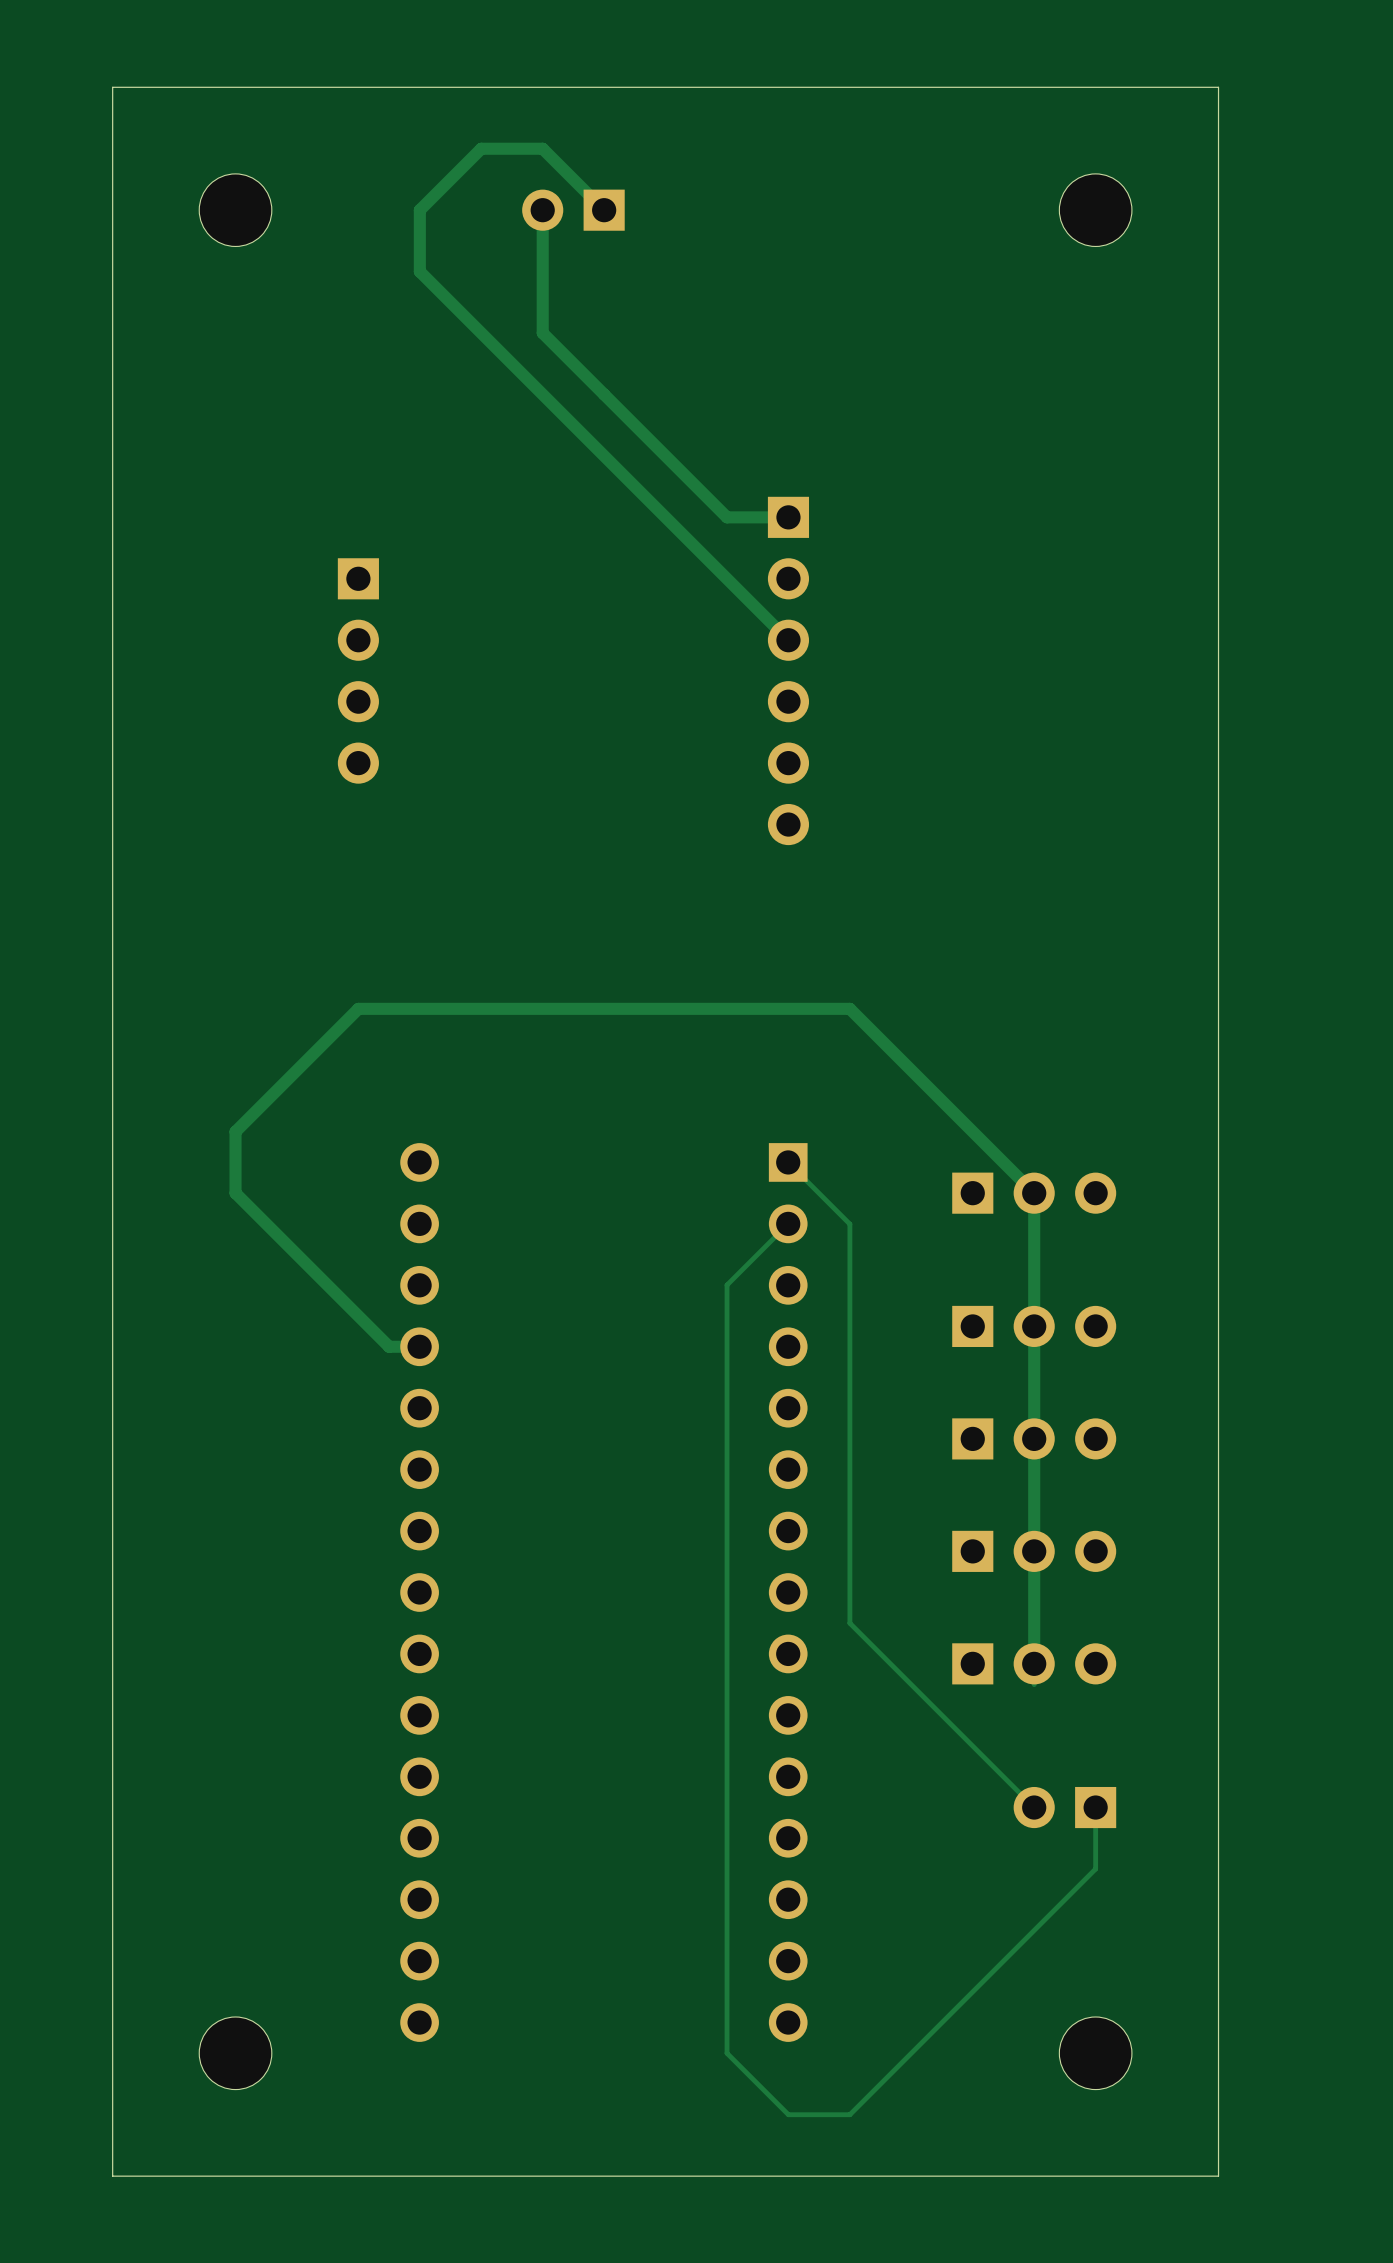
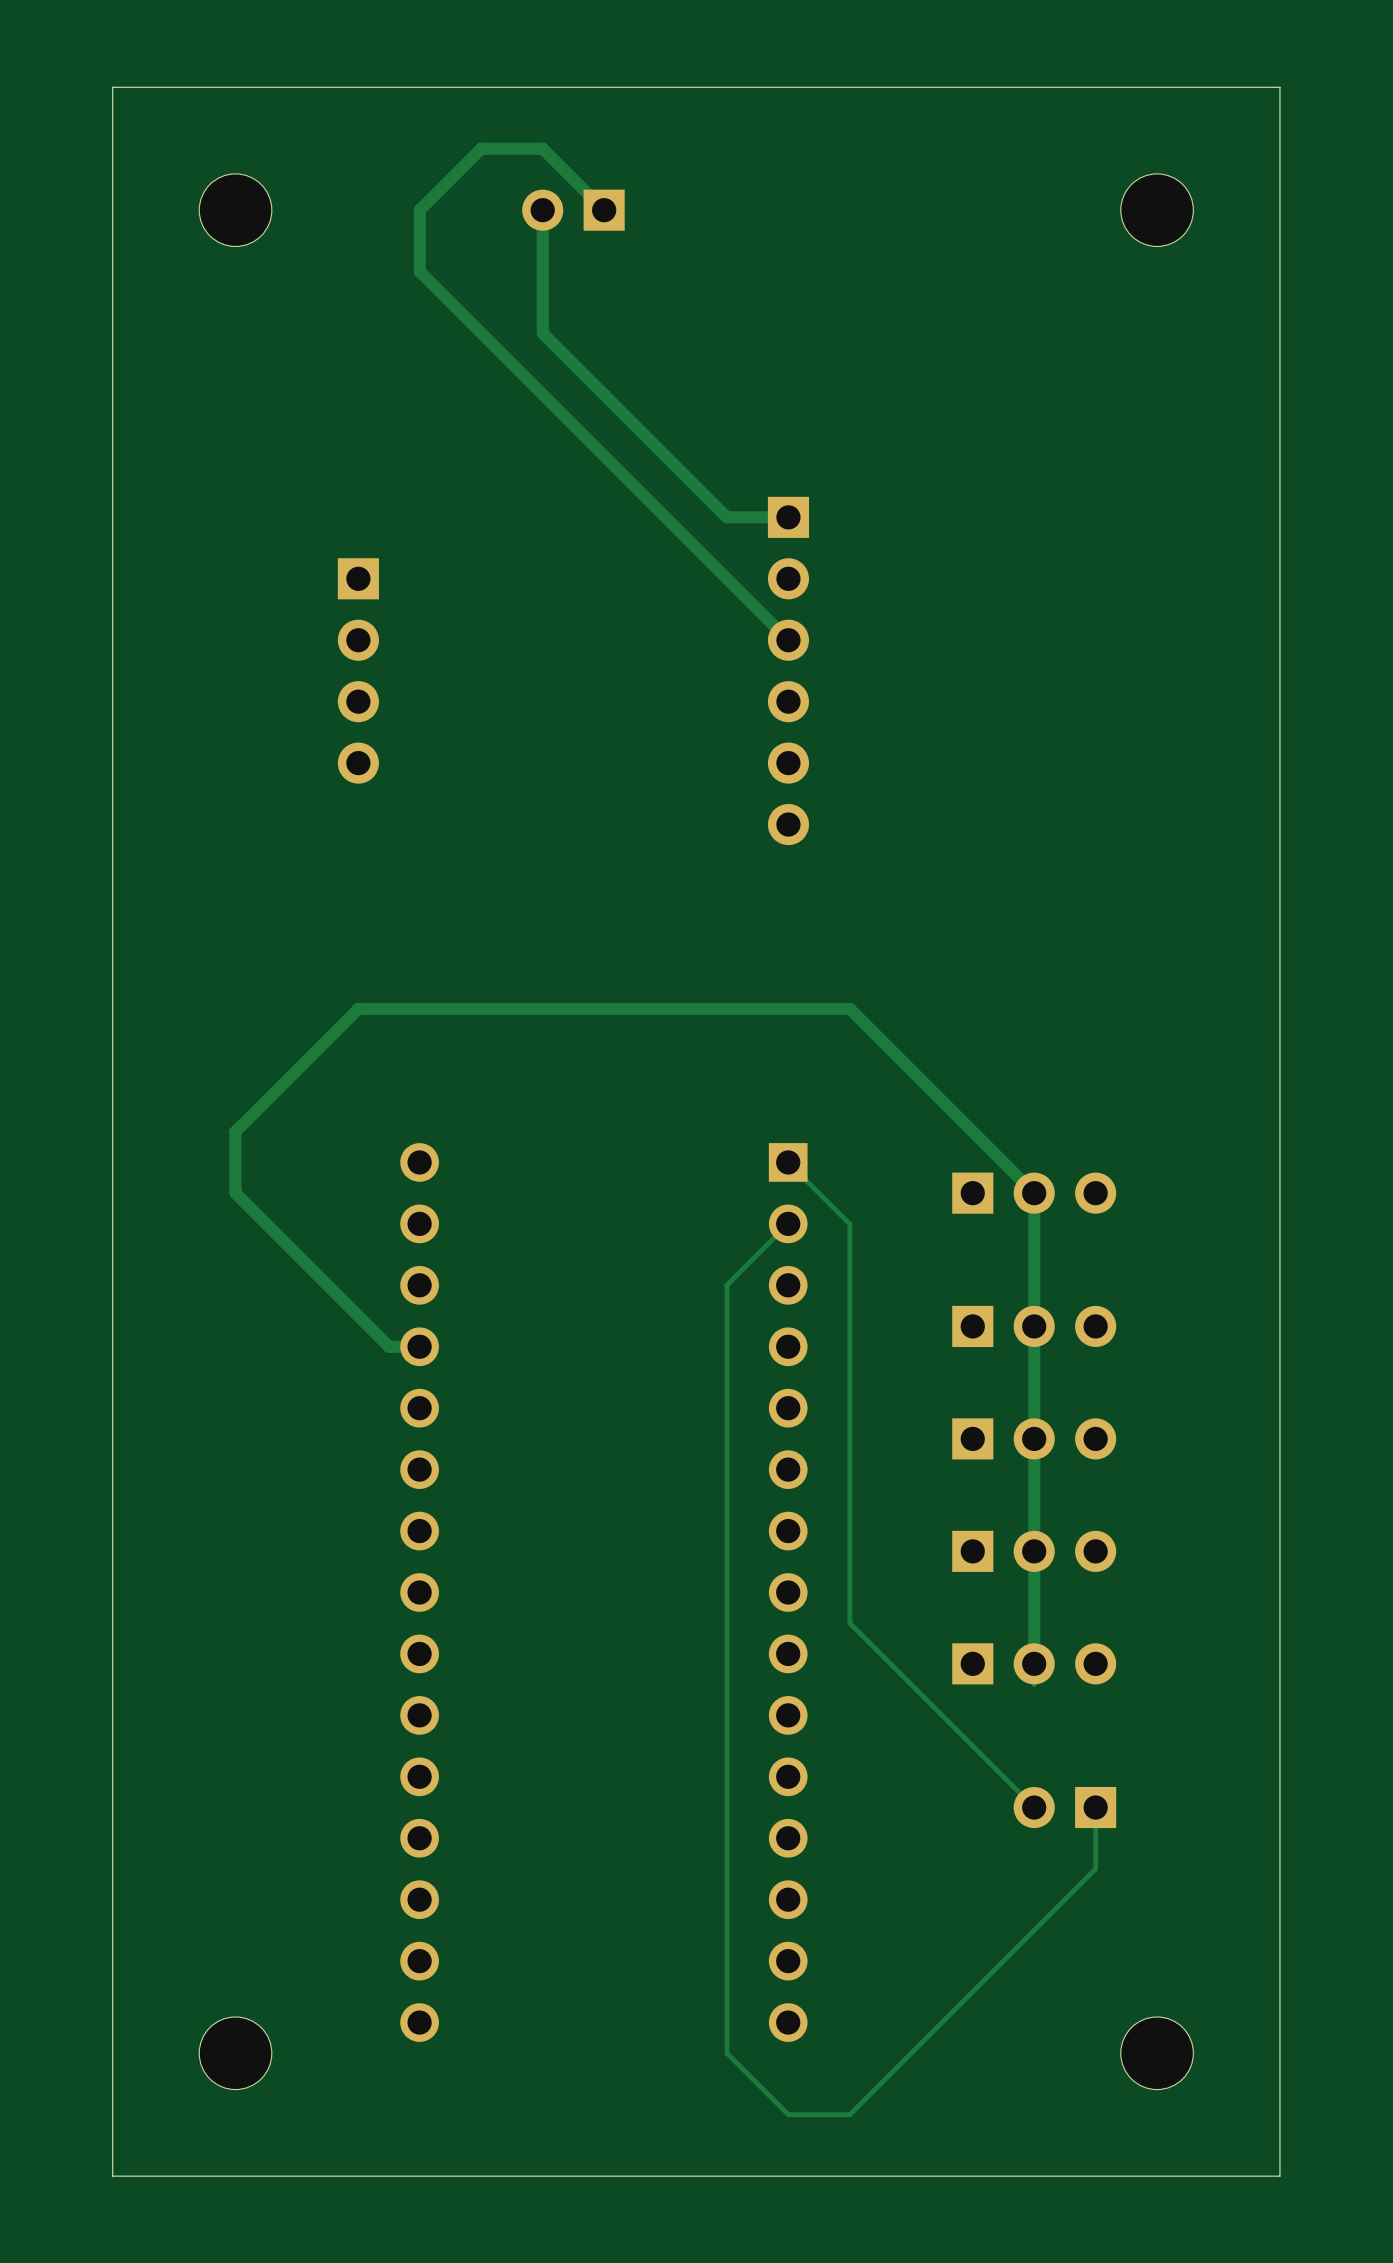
board edge: (1218, 87) (1218, 2176) -> (1218, 87) (1279, 87) (1279, 2176) (1218, 2176)
part position: (1095, 210) -> (1157, 210)
part position: (1095, 2053) -> (1157, 2053)

